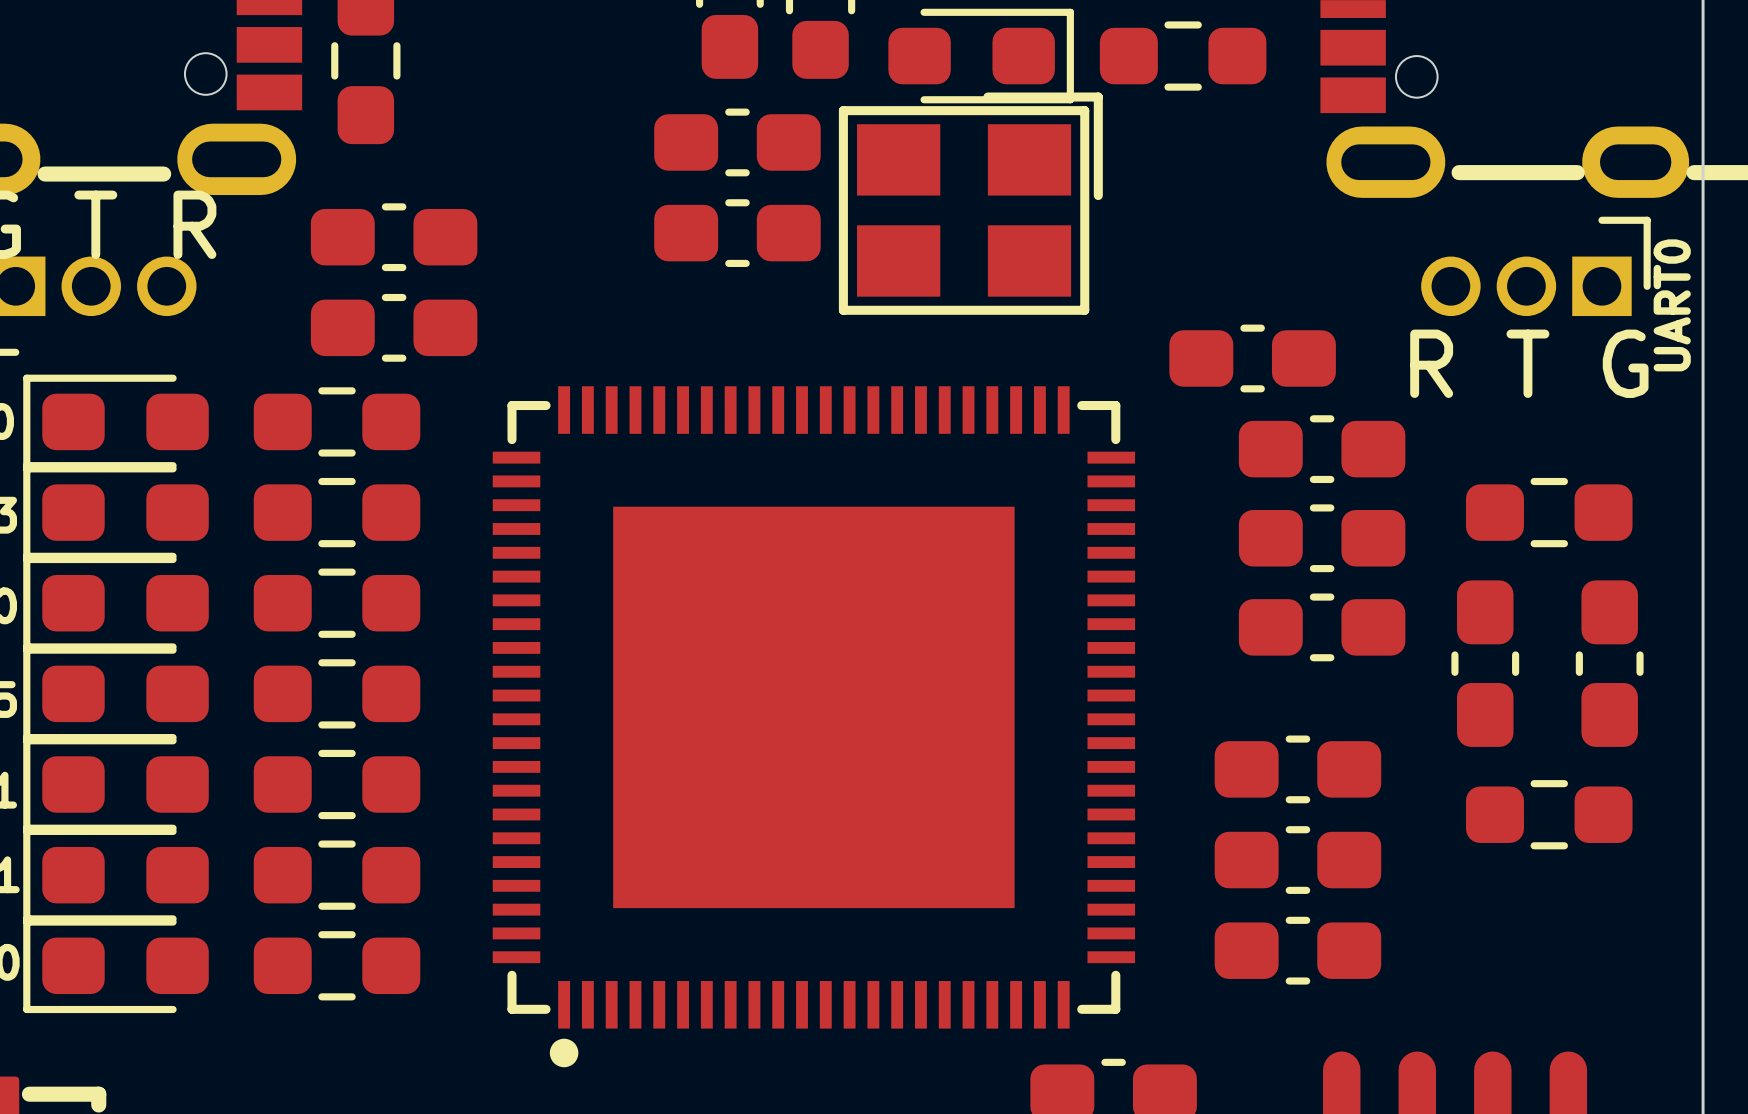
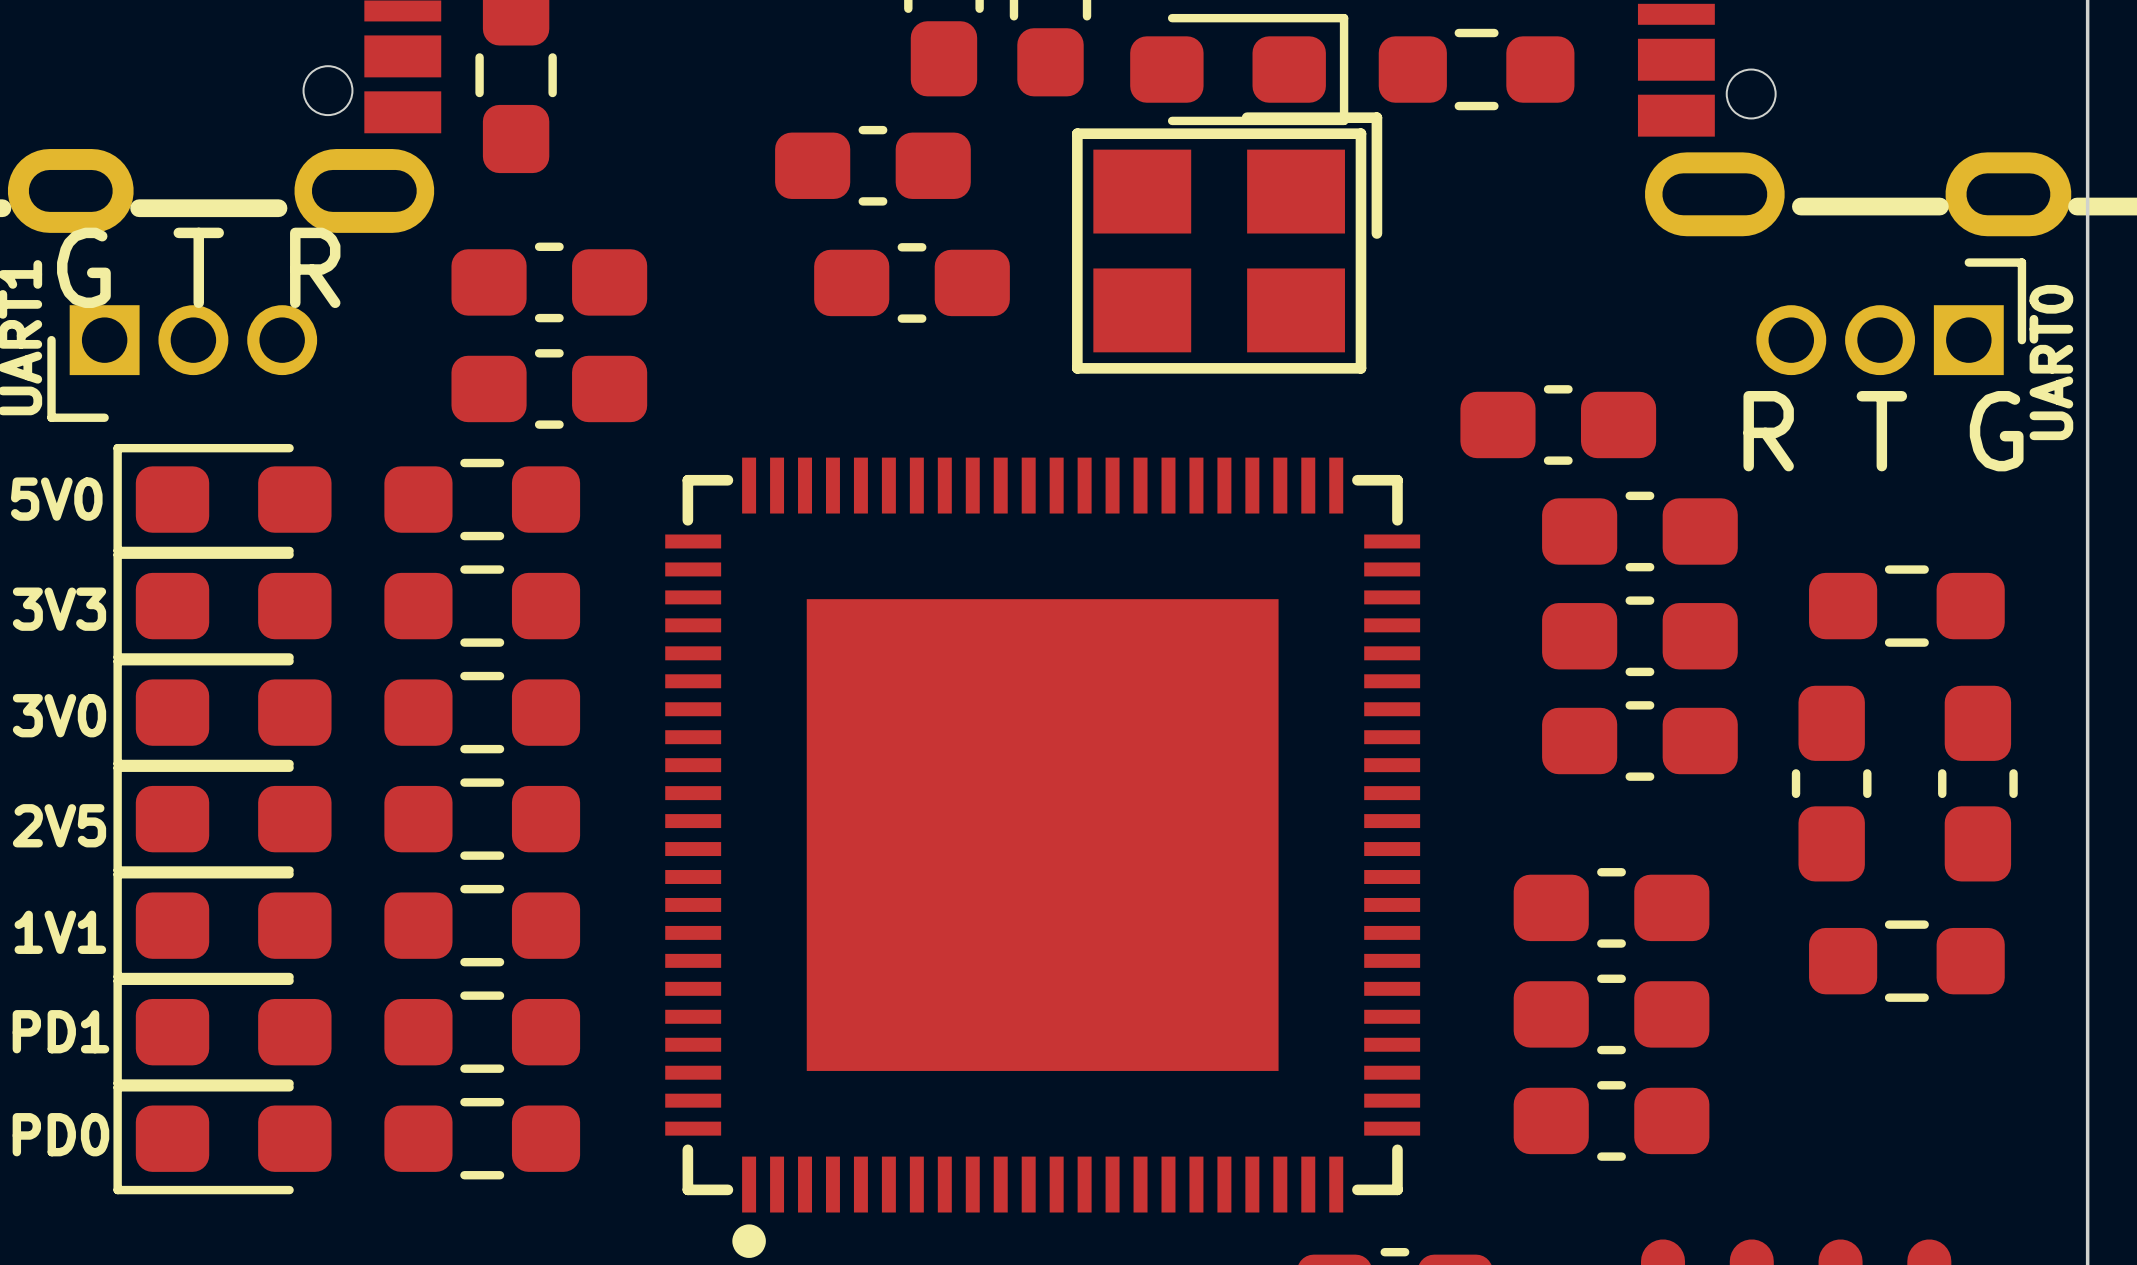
part position: (737, 142) -> (872, 165)
part position: (737, 233) -> (912, 282)

